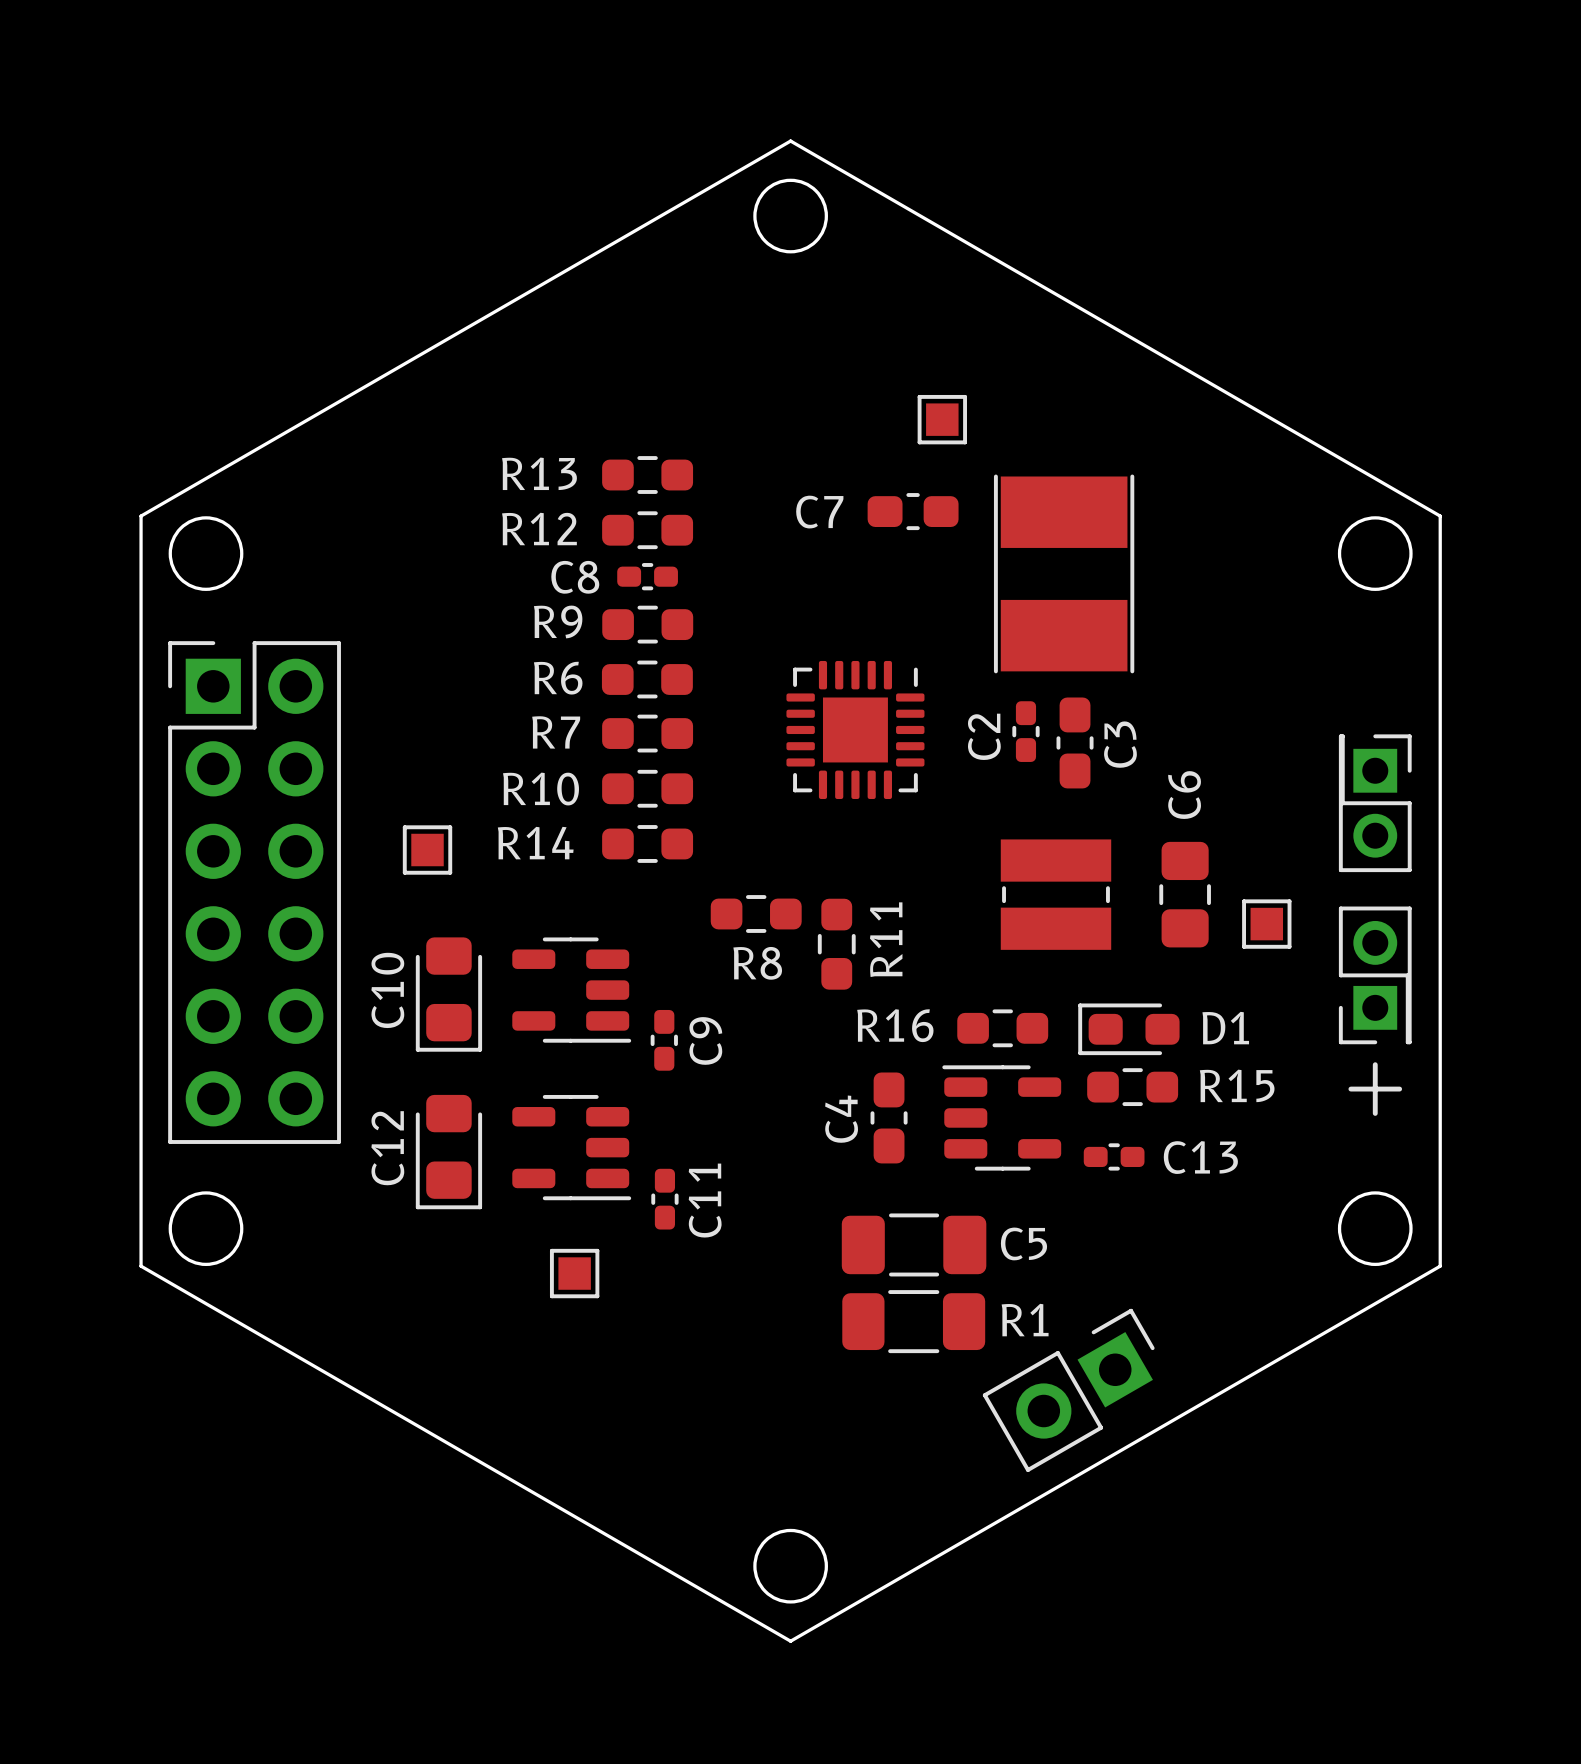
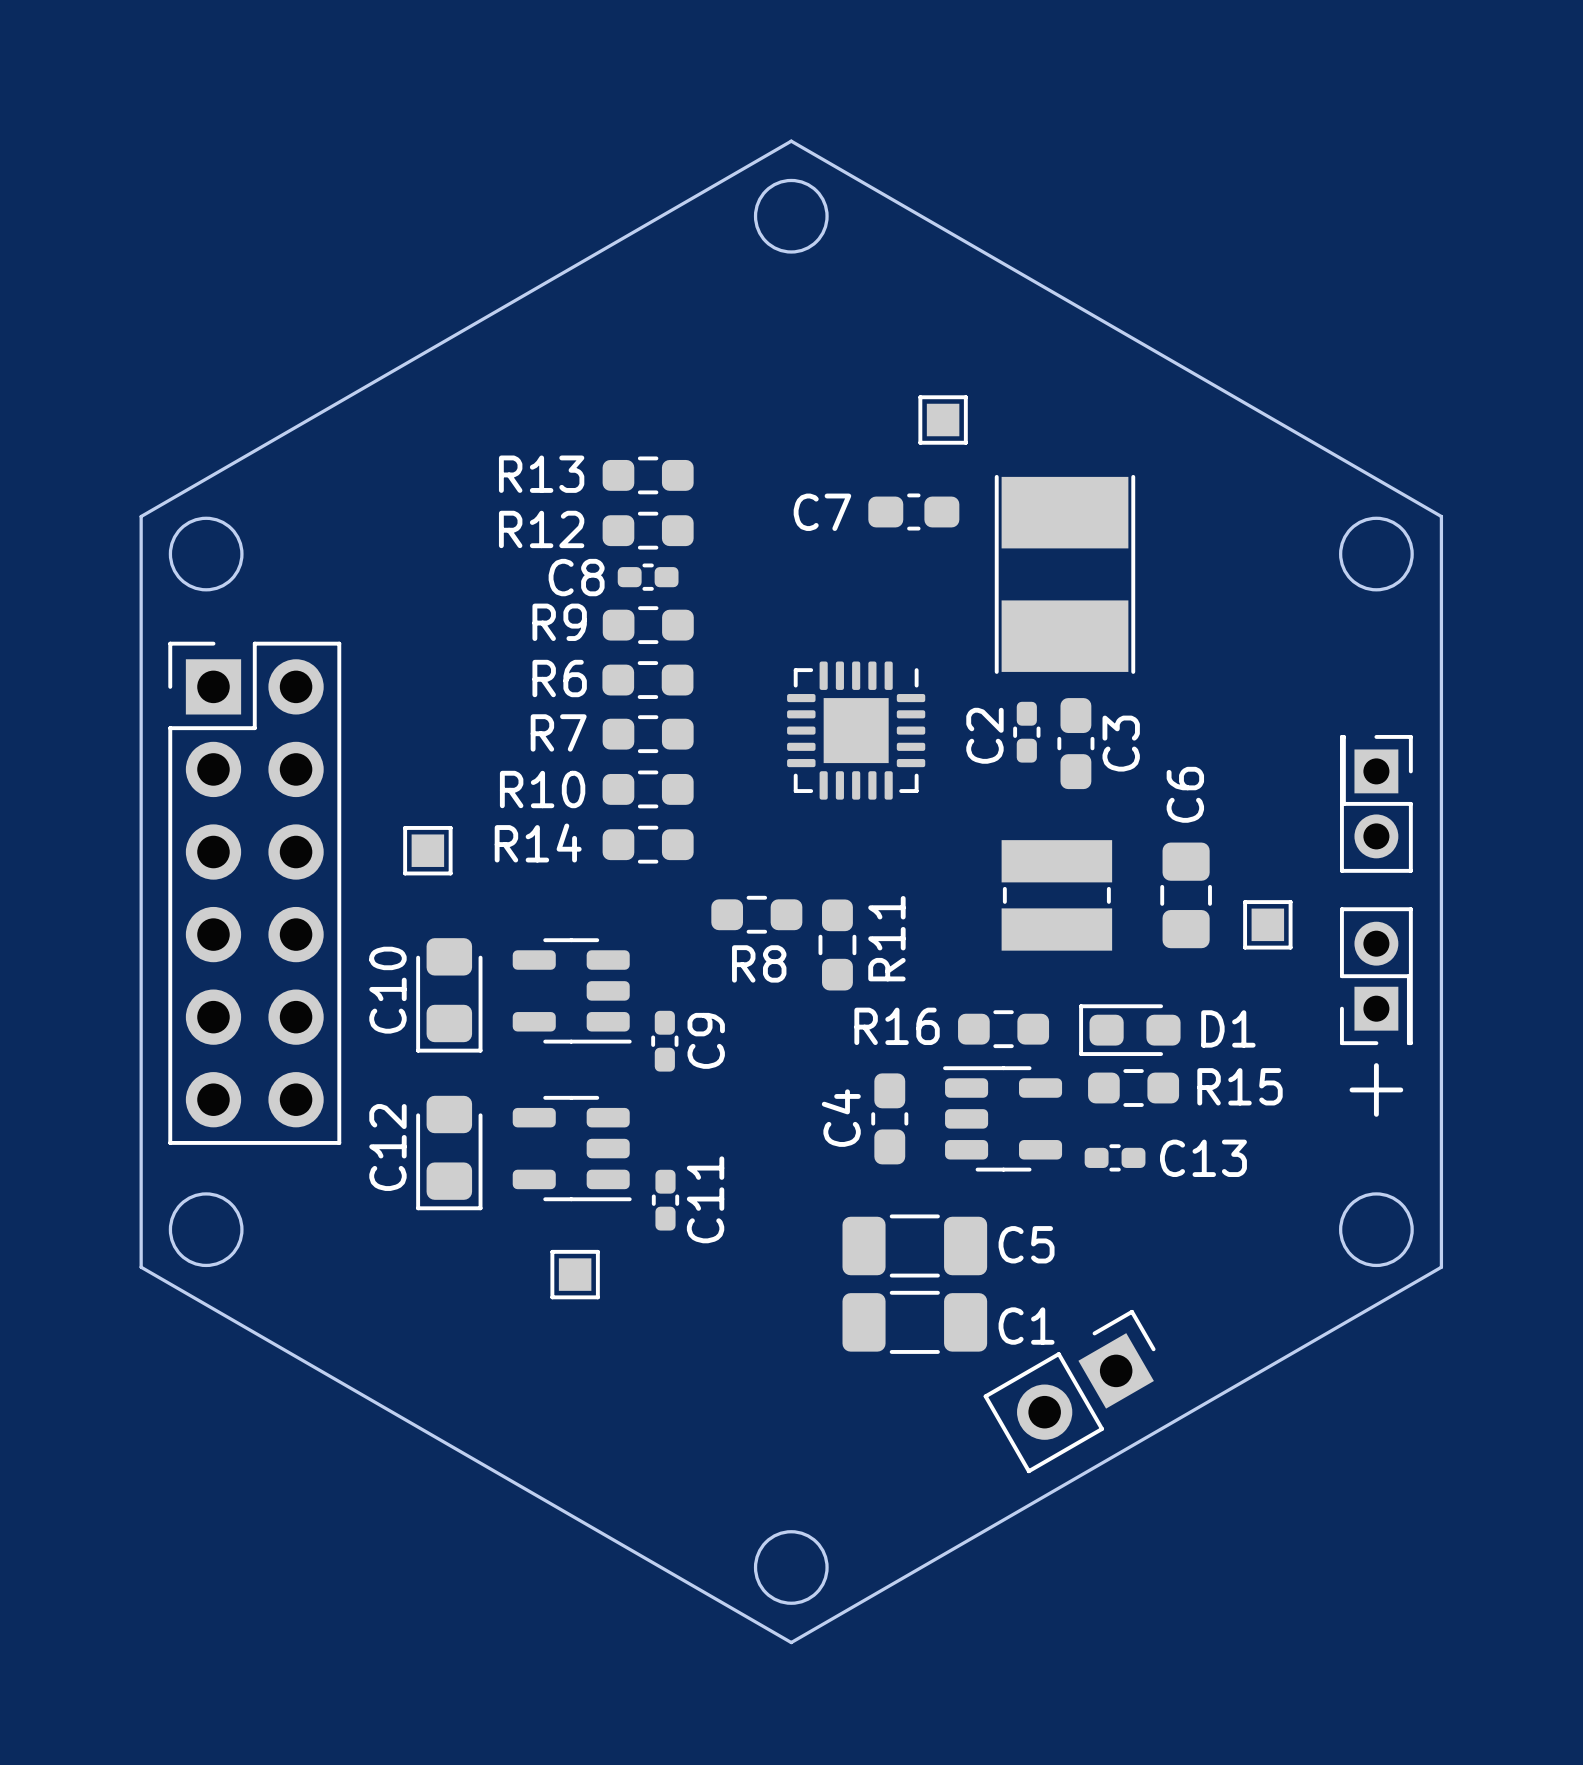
R1: (913, 1321) -> none
C1: none -> (914, 1322)

